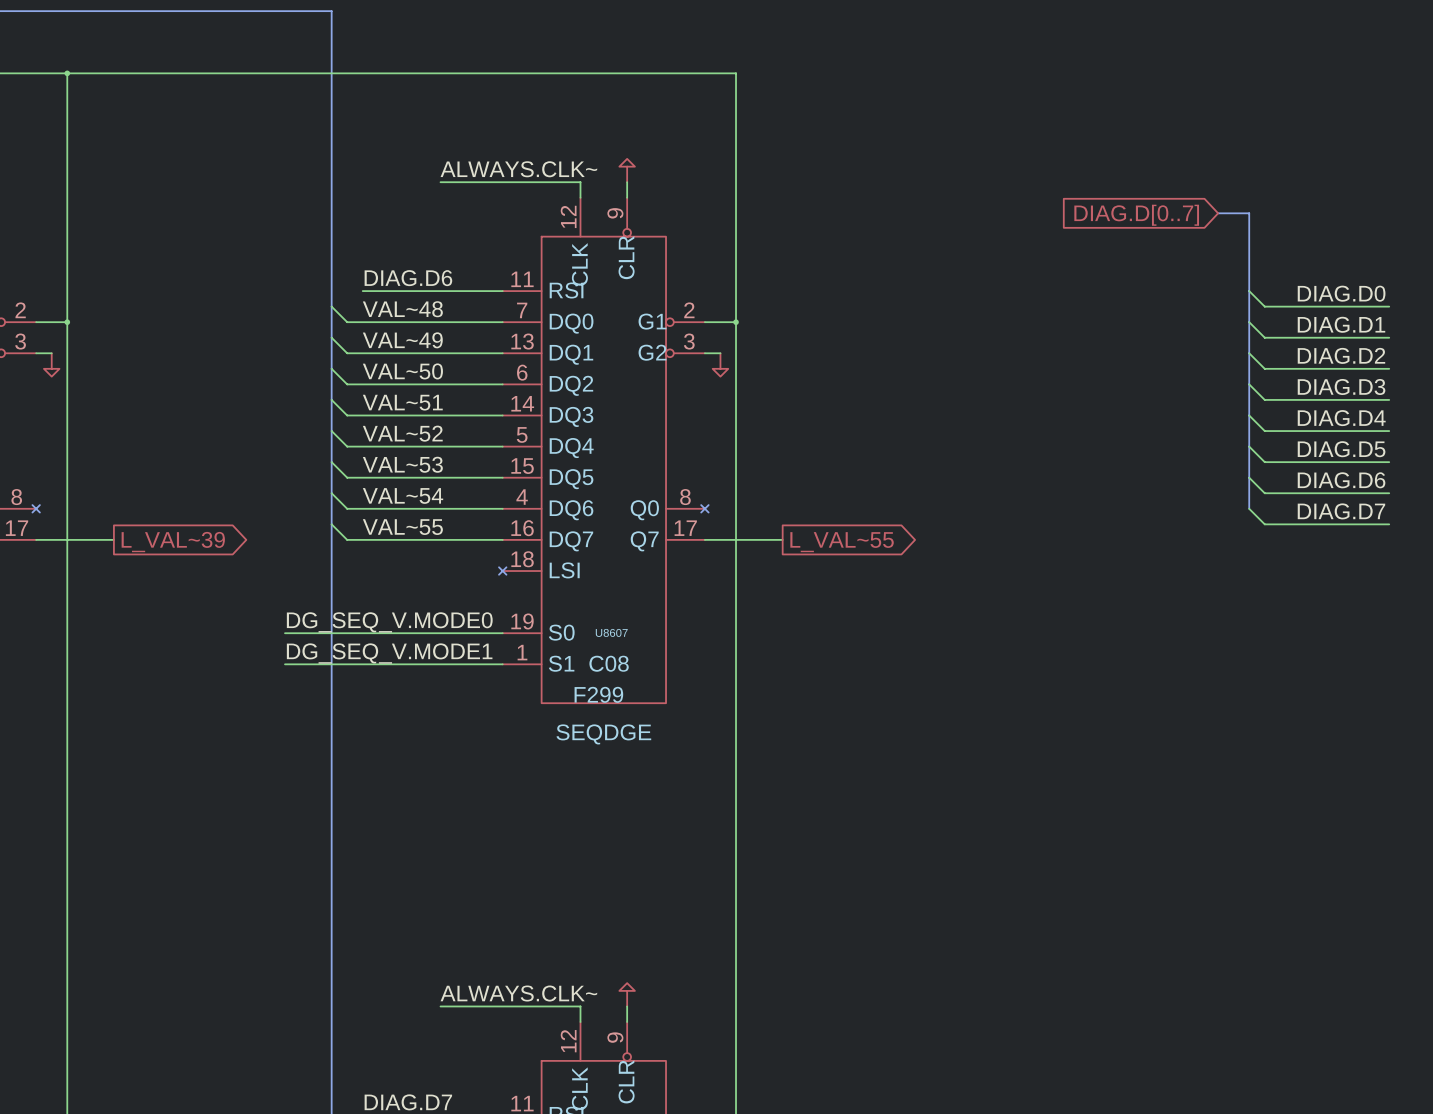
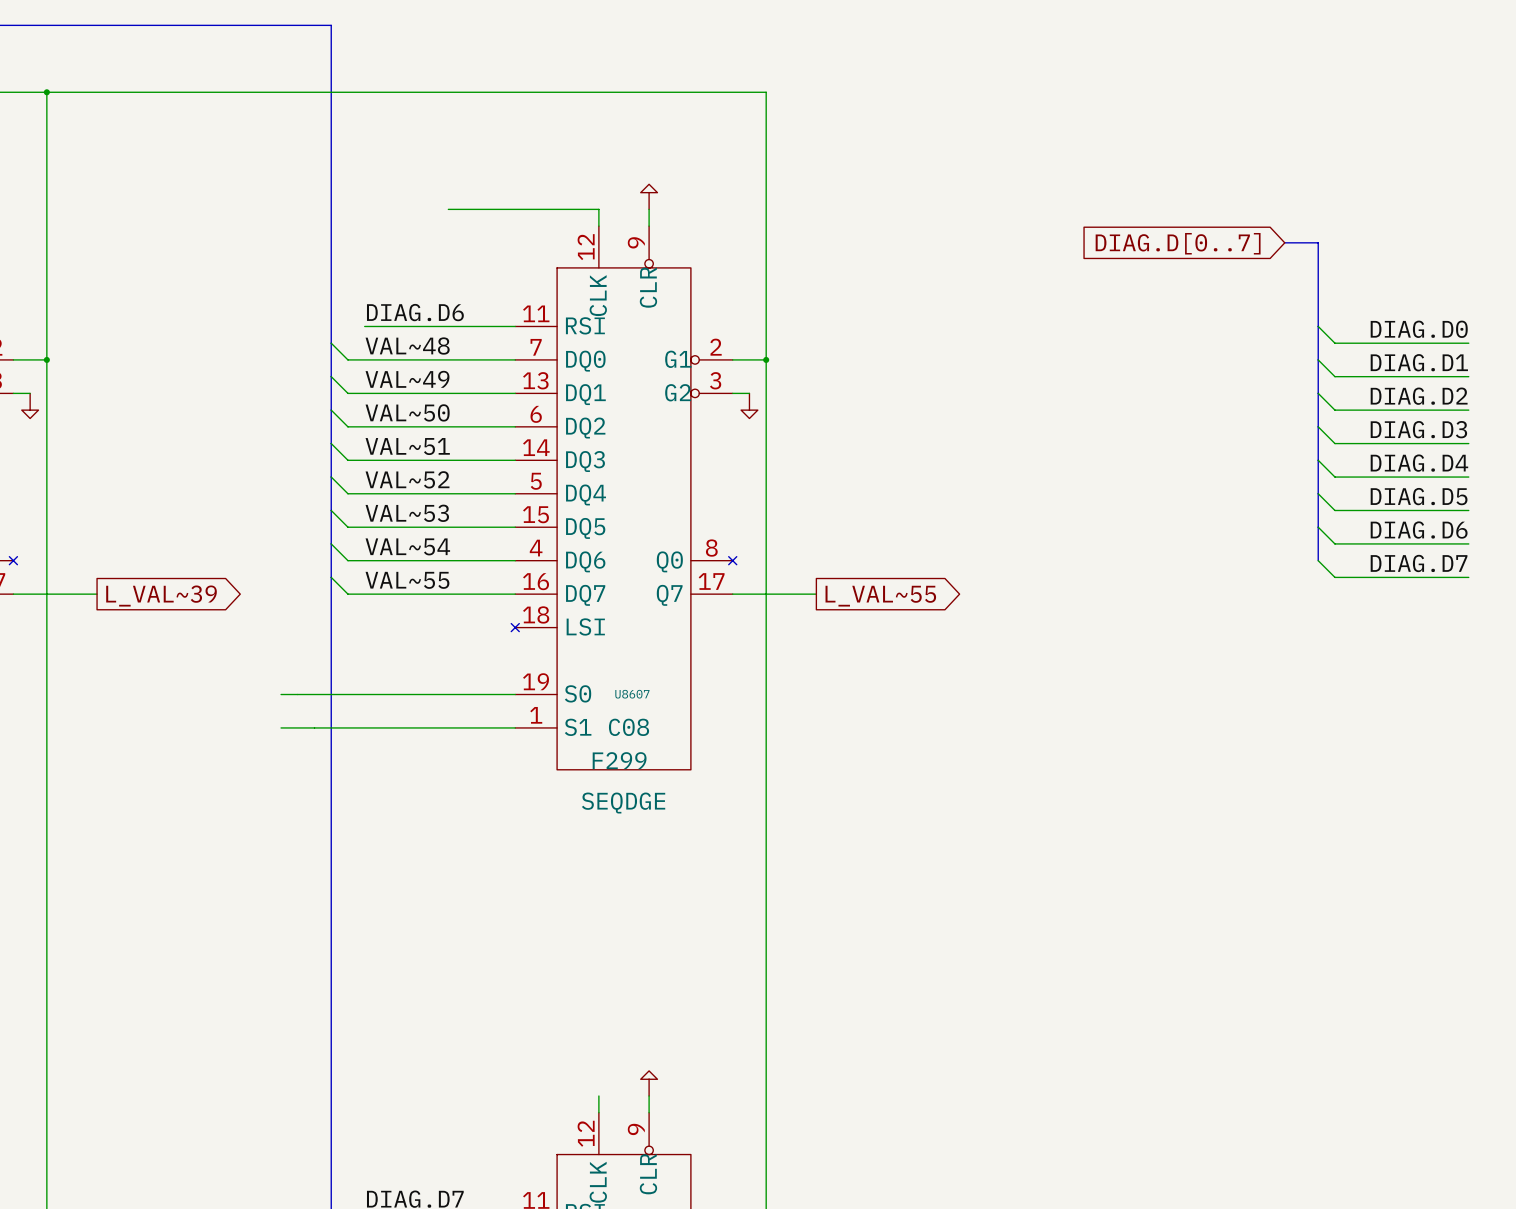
label: ALWAYS.CLK~ (518, 169) -> none
label: DG_SEQ_V.MODE0 (389, 622) -> none
label: DG_SEQ_V.MODE1 (389, 653) -> none
label: ALWAYS.CLK~ (518, 993) -> none
wire: (440, 1006) (580, 1006) -> none

